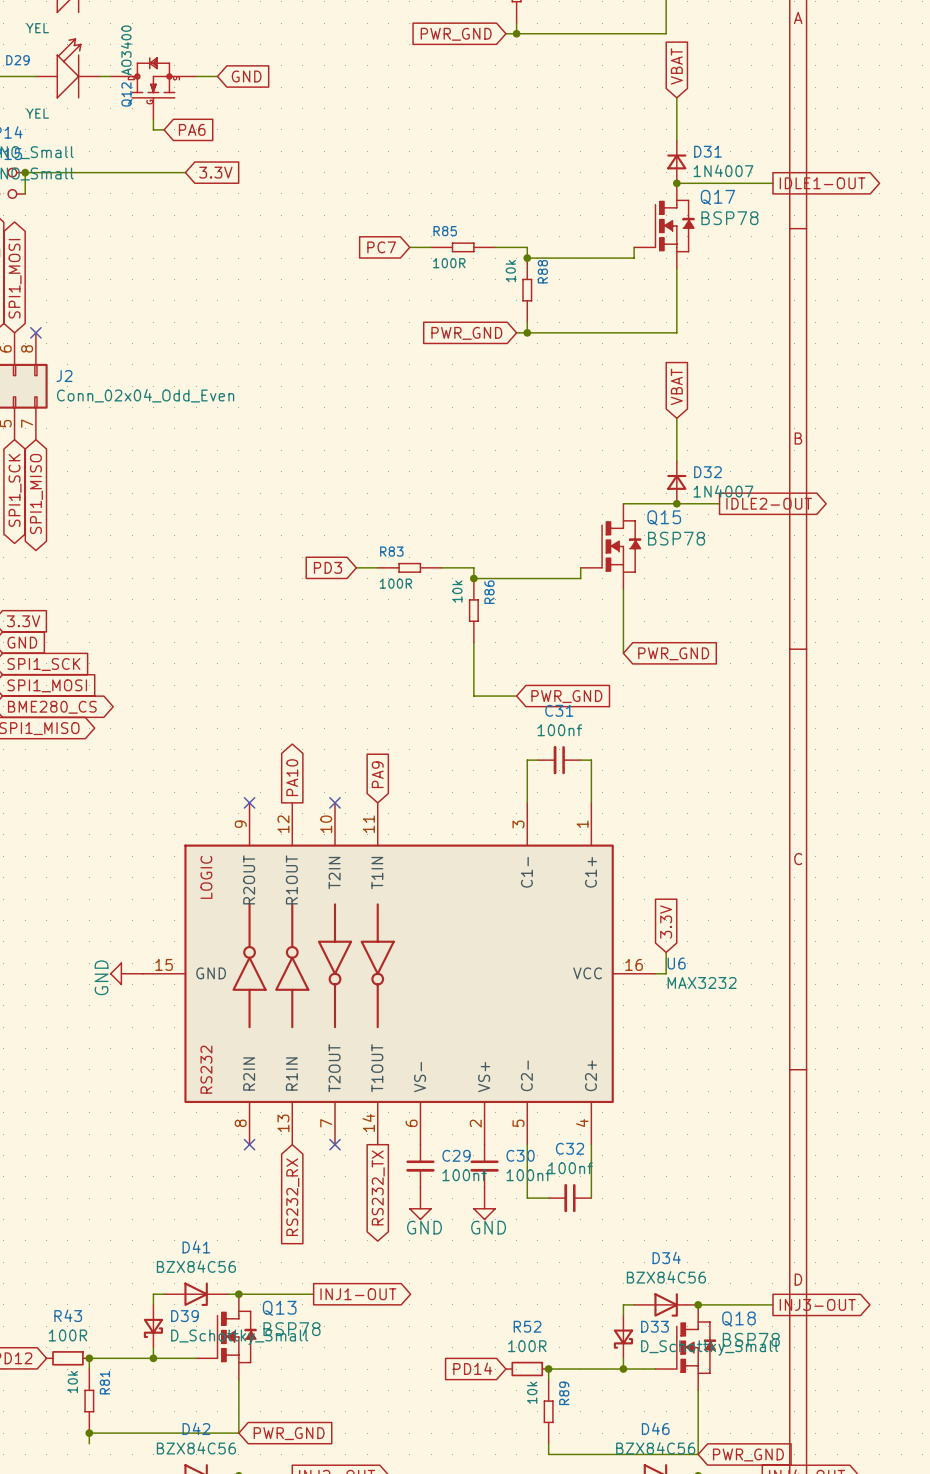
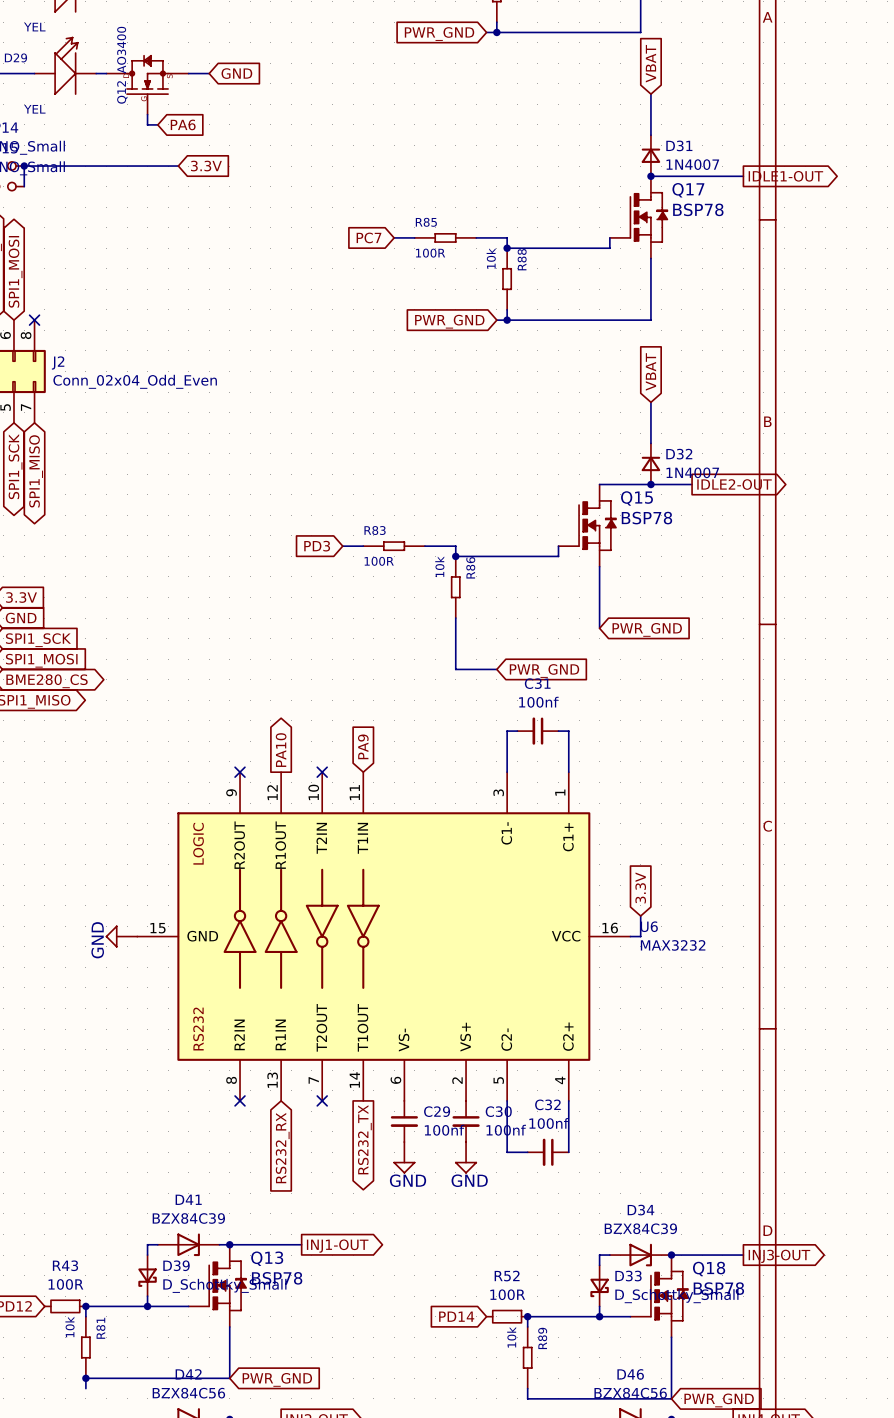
D41 value: BZX84C56 (196, 1266) -> BZX84C39 (188, 1218)
D34 value: BZX84C56 (666, 1277) -> BZX84C39 (640, 1228)

